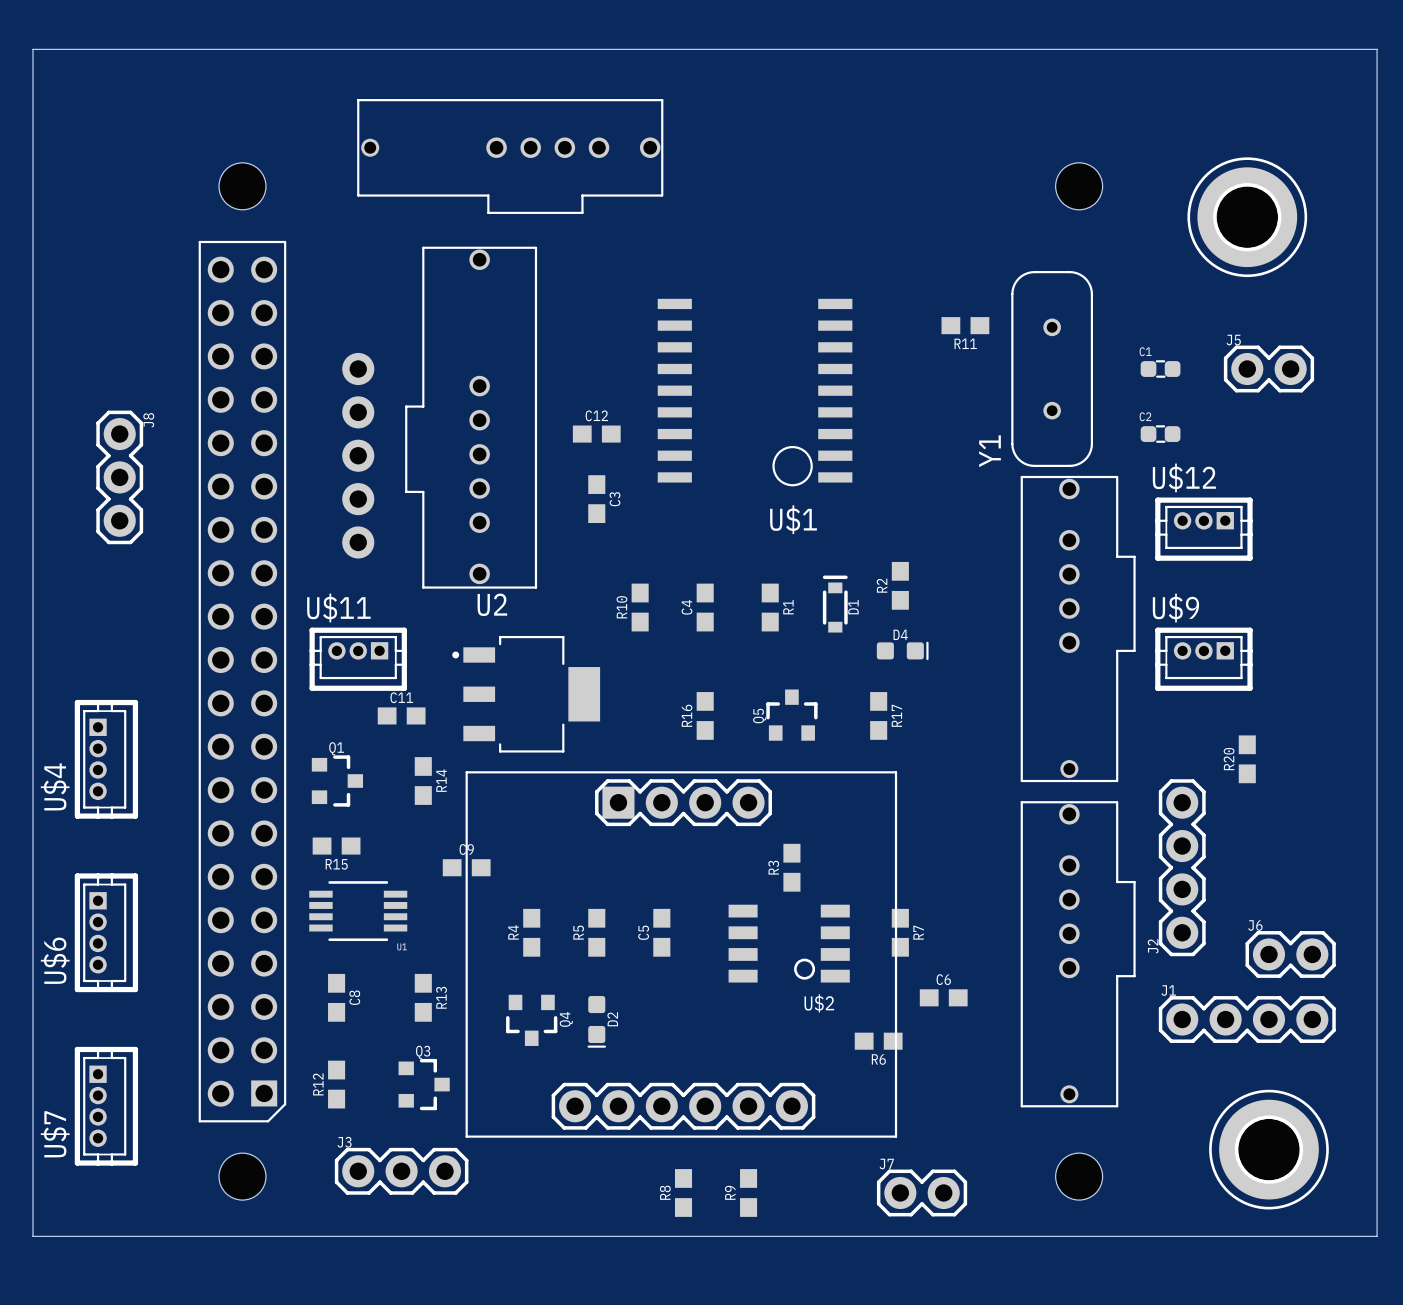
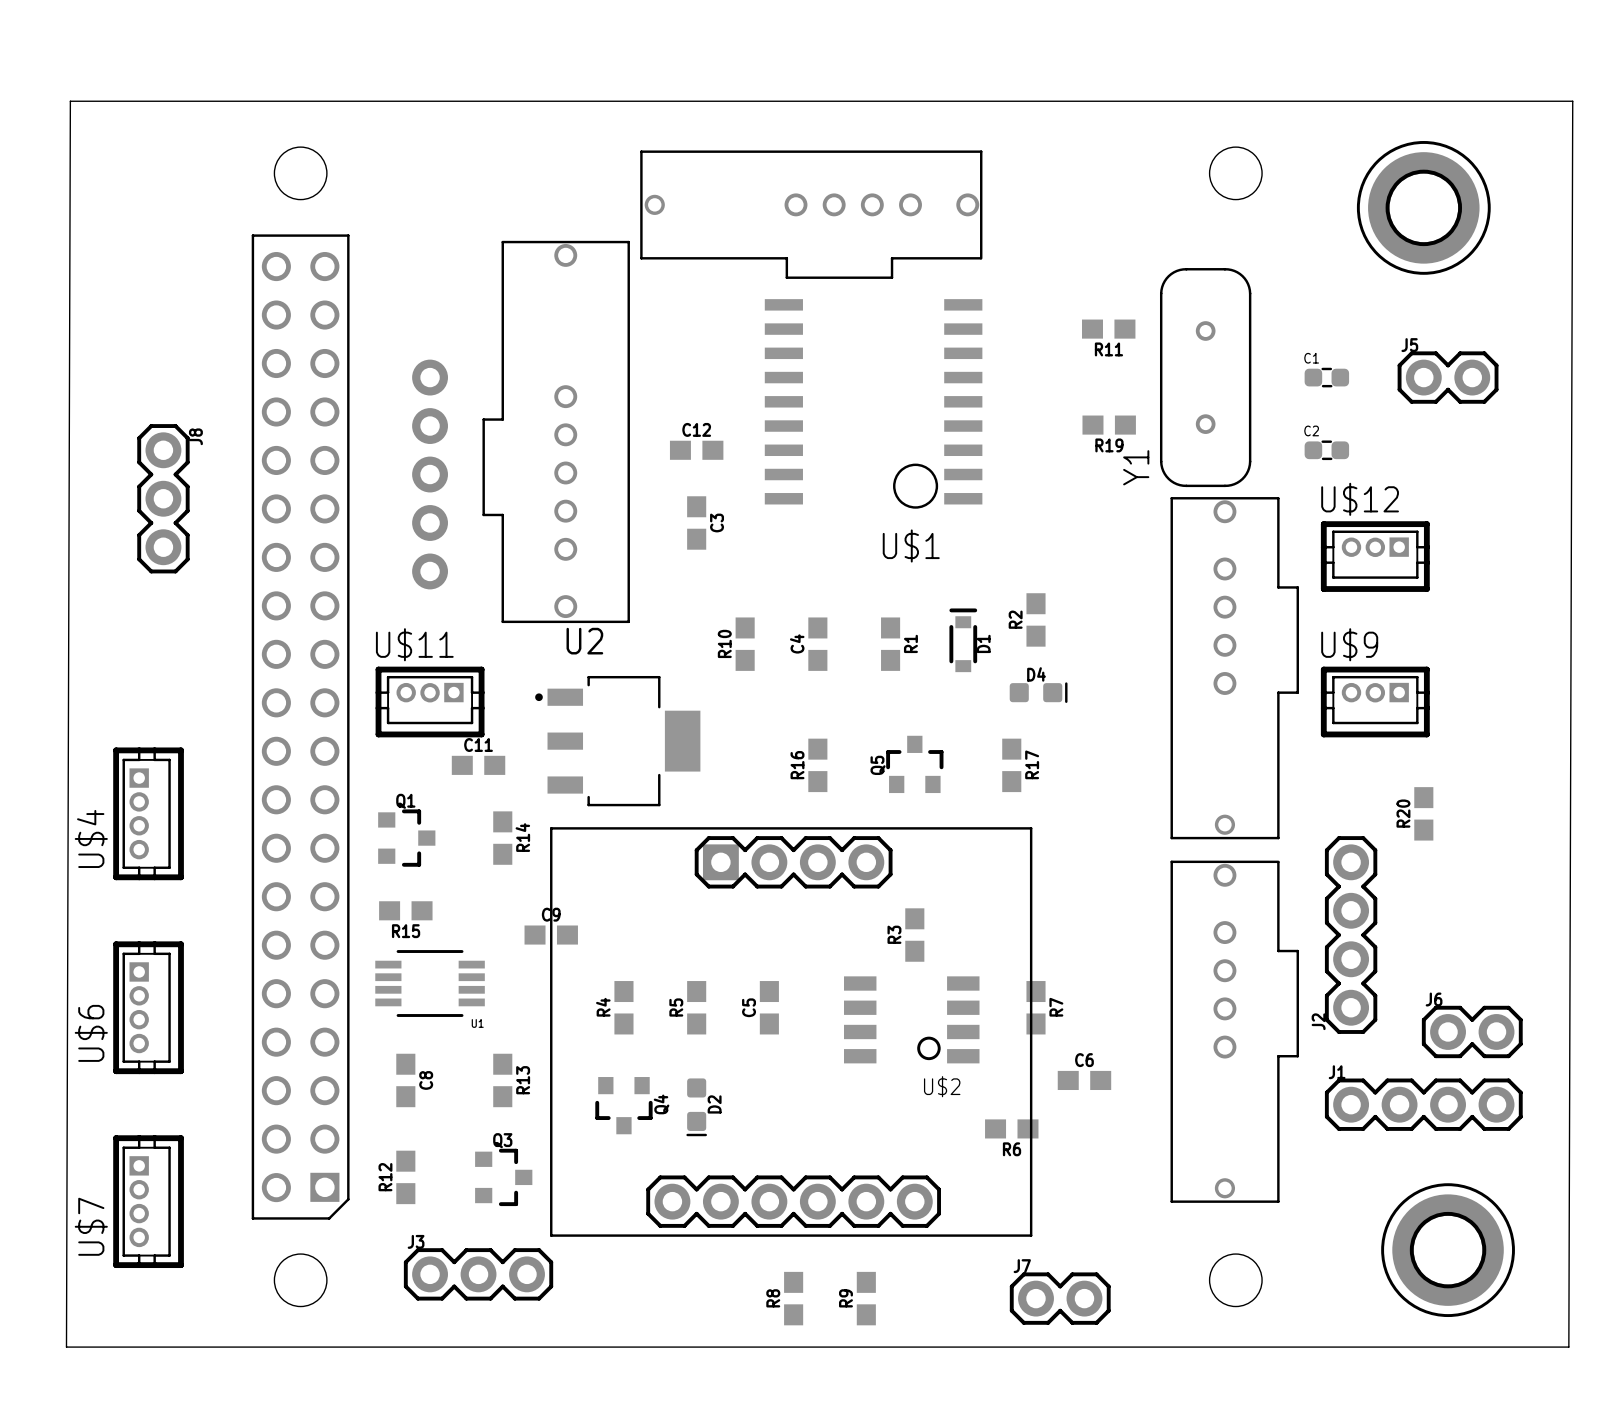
part position: (510, 156) -> (811, 214)
R19: none -> (1109, 425)
board edge: (32, 1236) (32, 49) (1377, 49) (1377, 1236) -> (66, 1347) (70, 101) (1572, 101) (1568, 1347)

